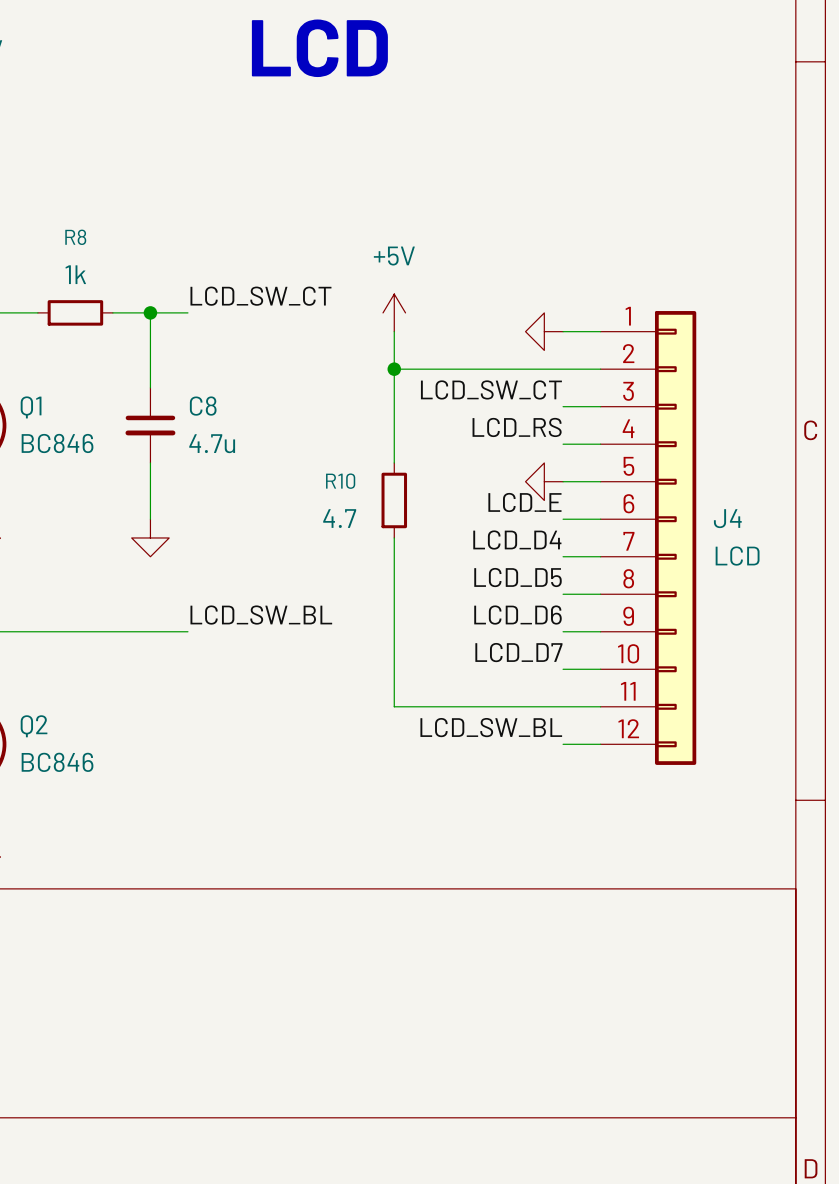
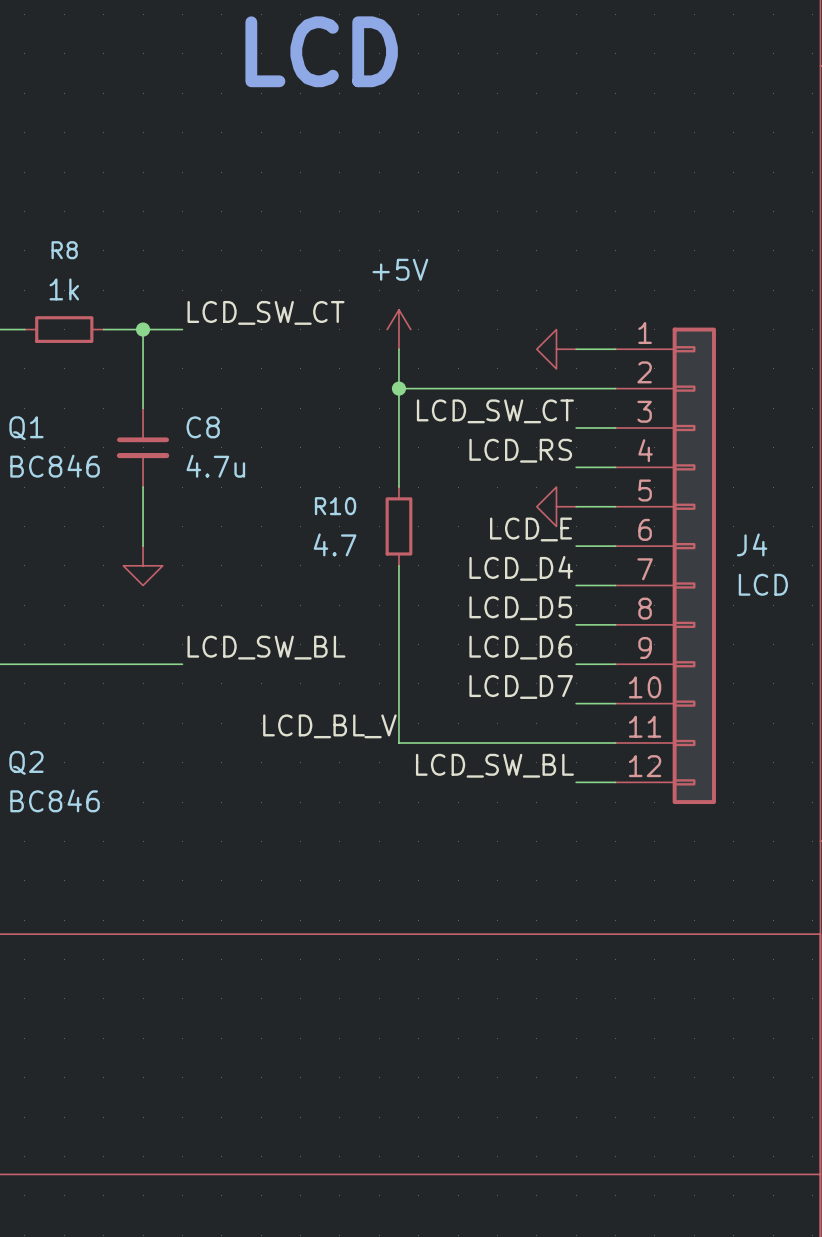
label: none -> LCD_BL_V (329, 726)

